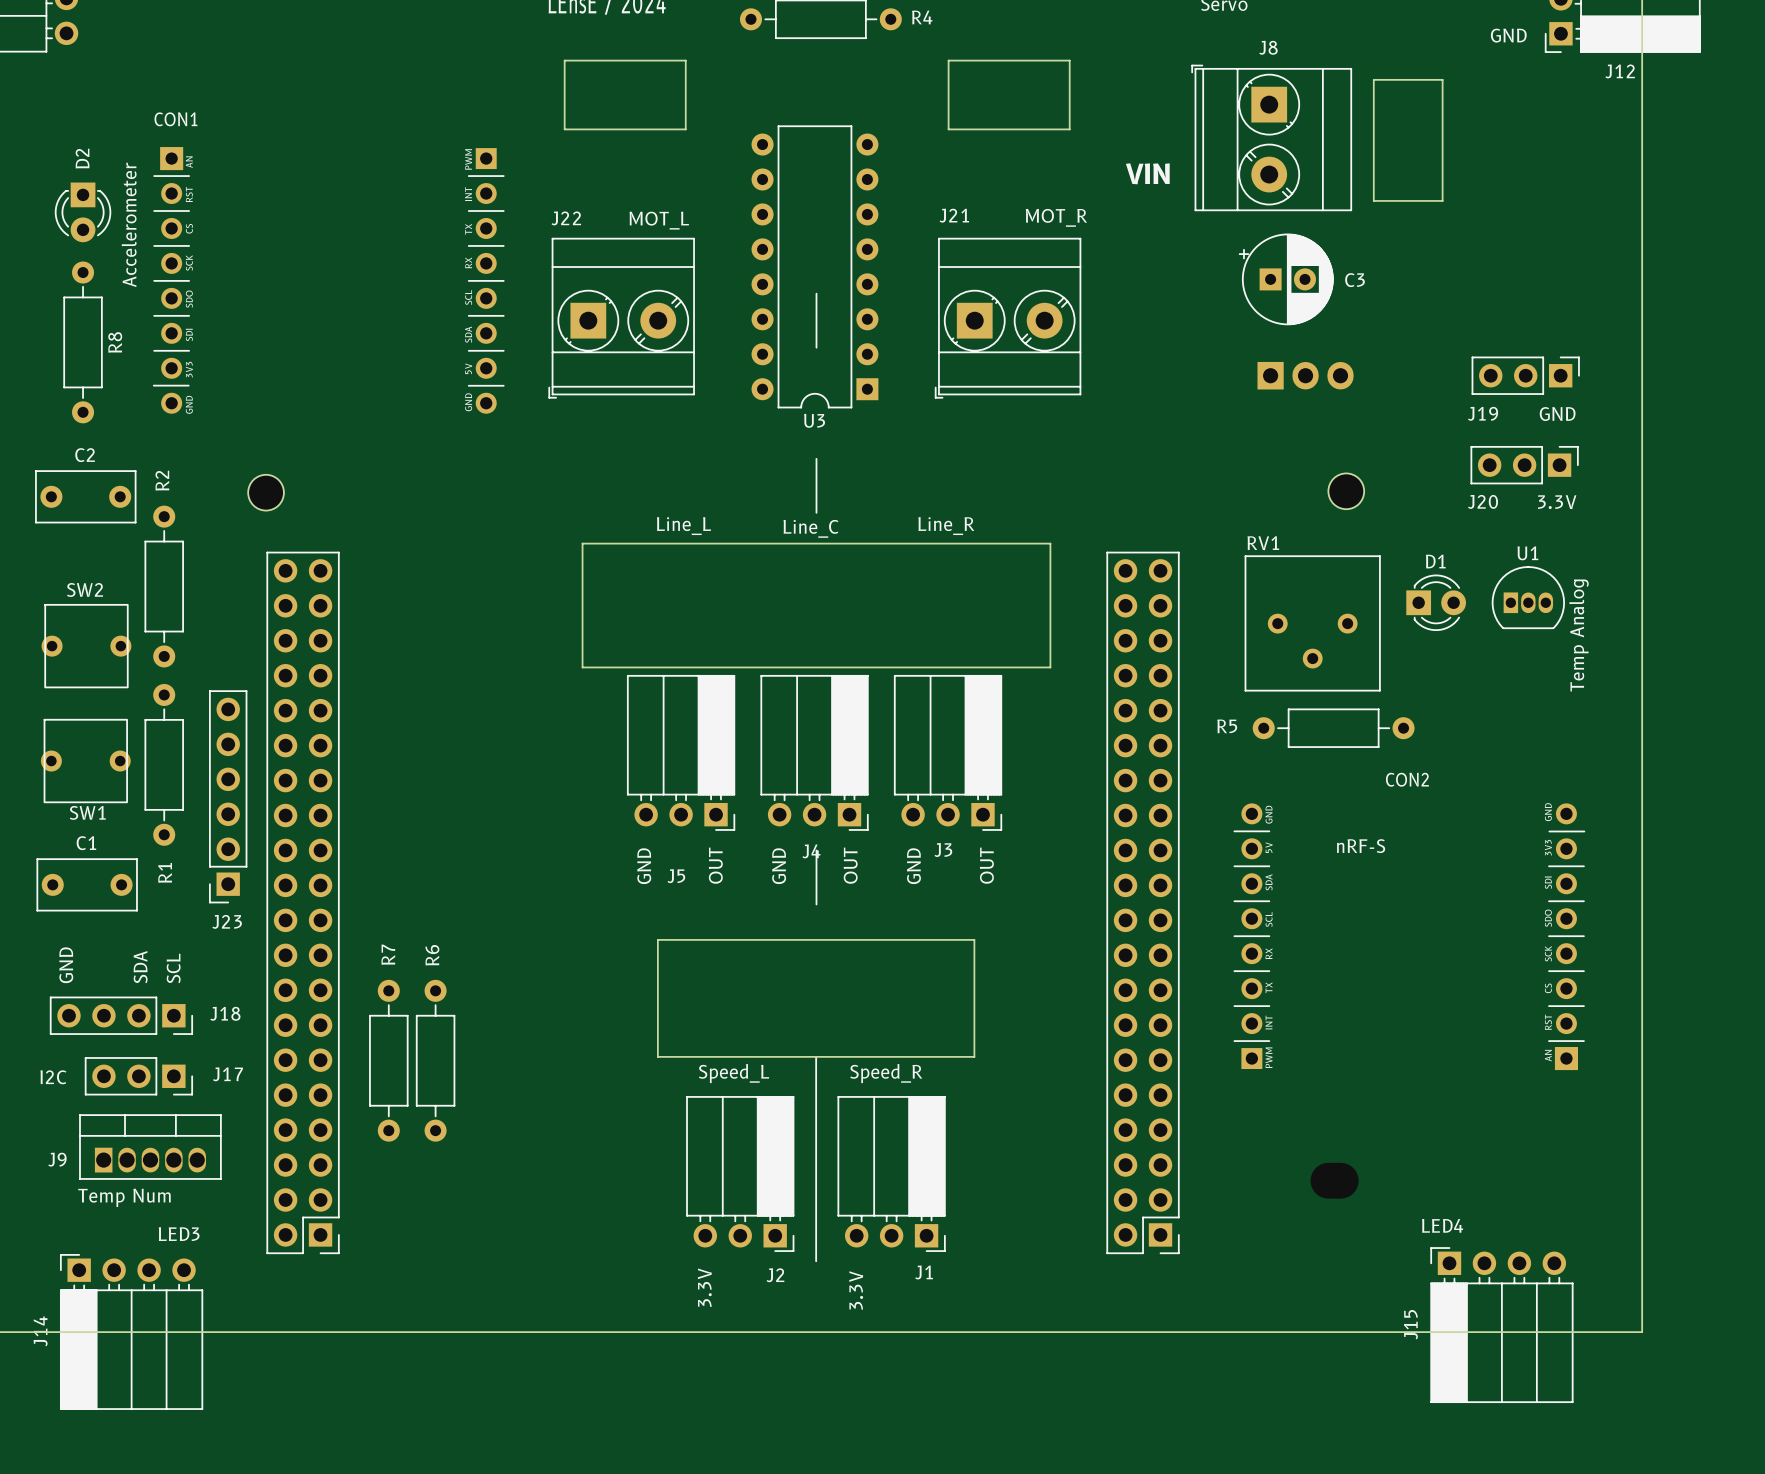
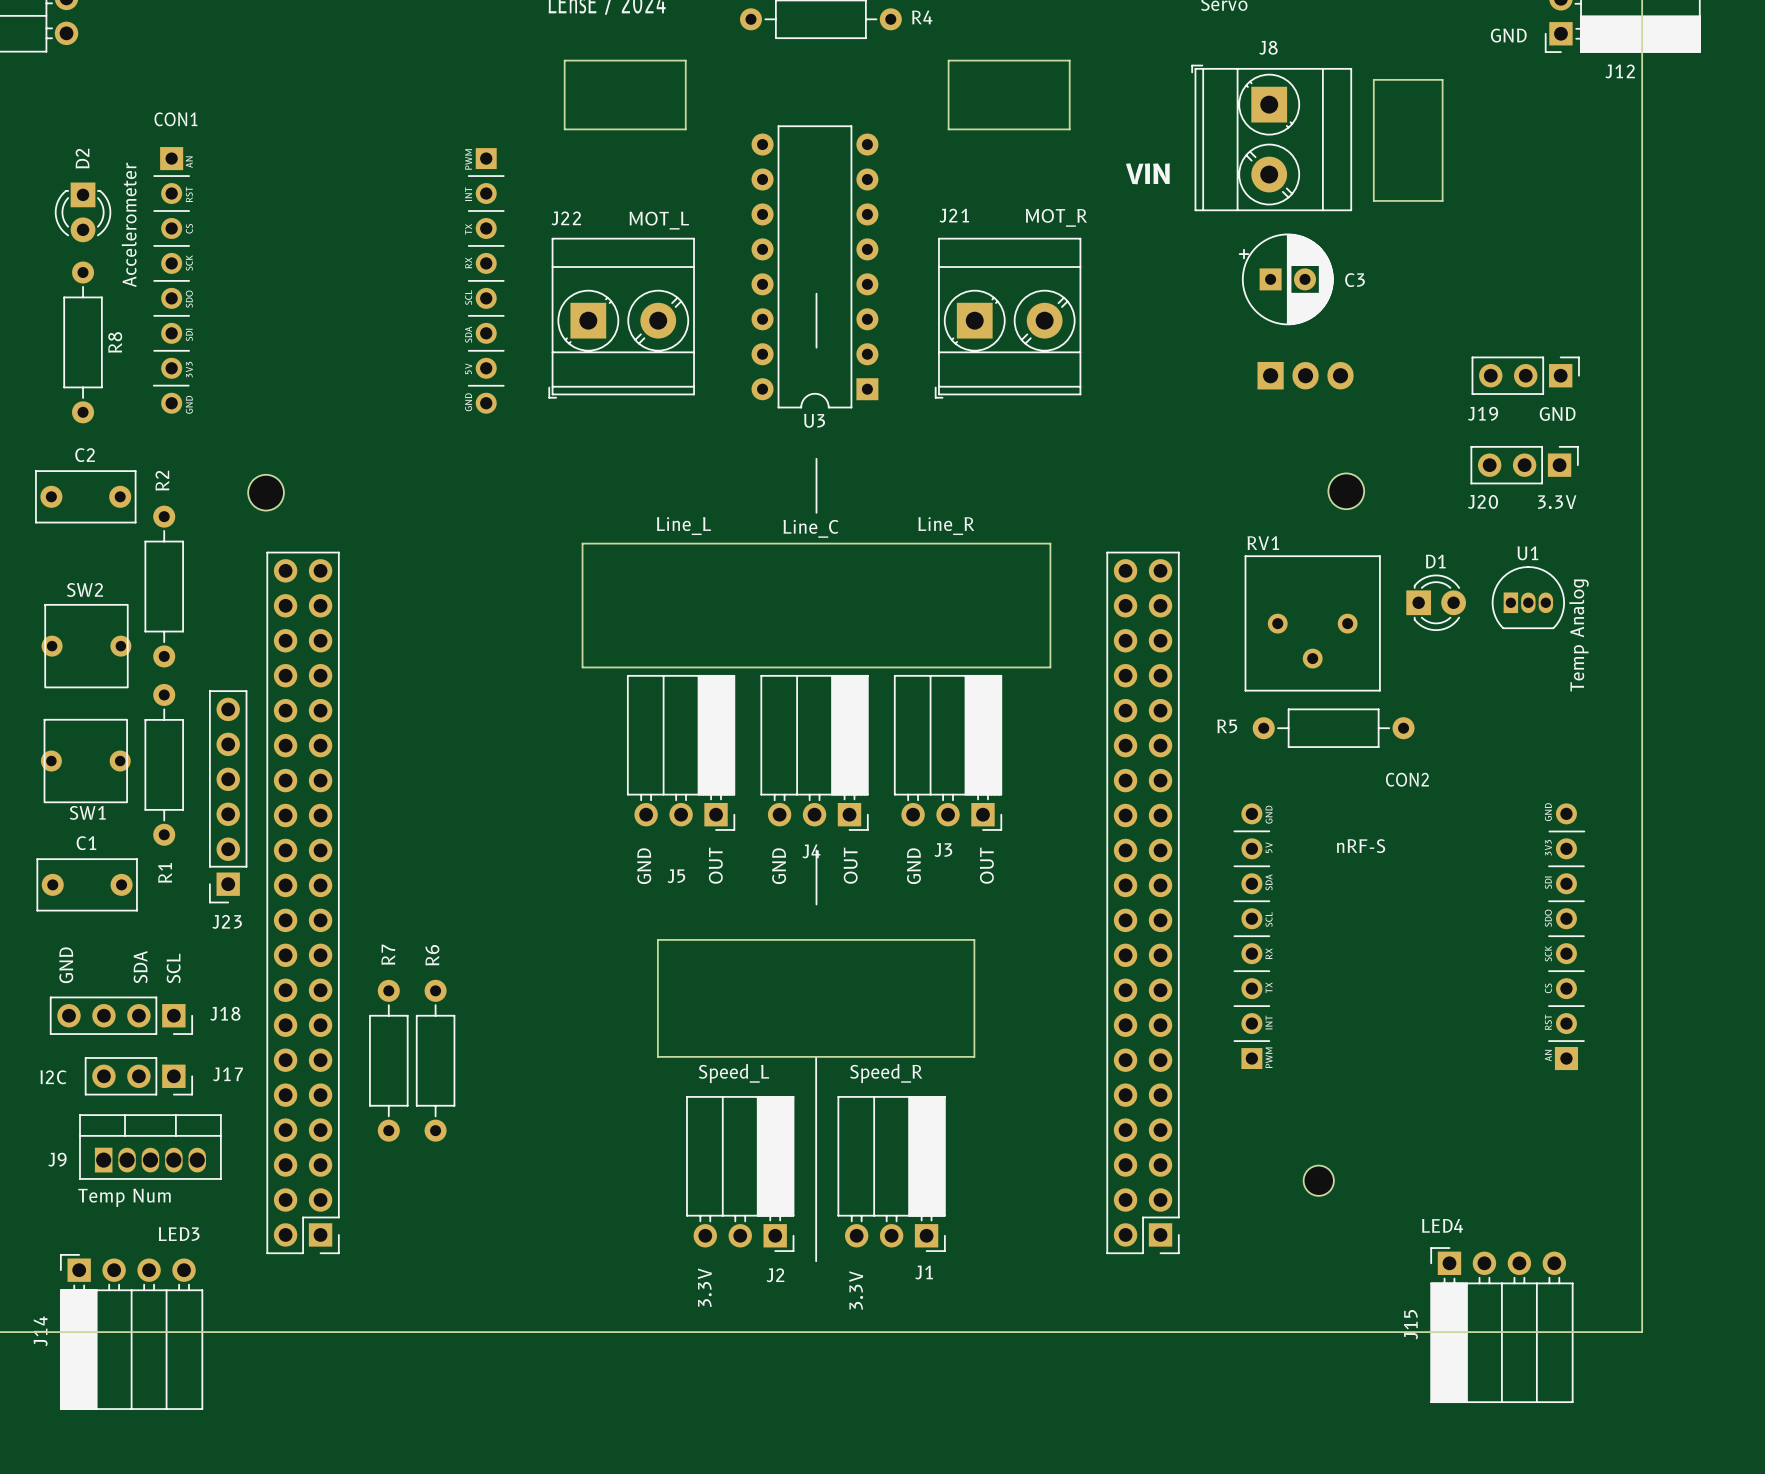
part: none -> (1318, 1180)
part: (1334, 1180) -> none

